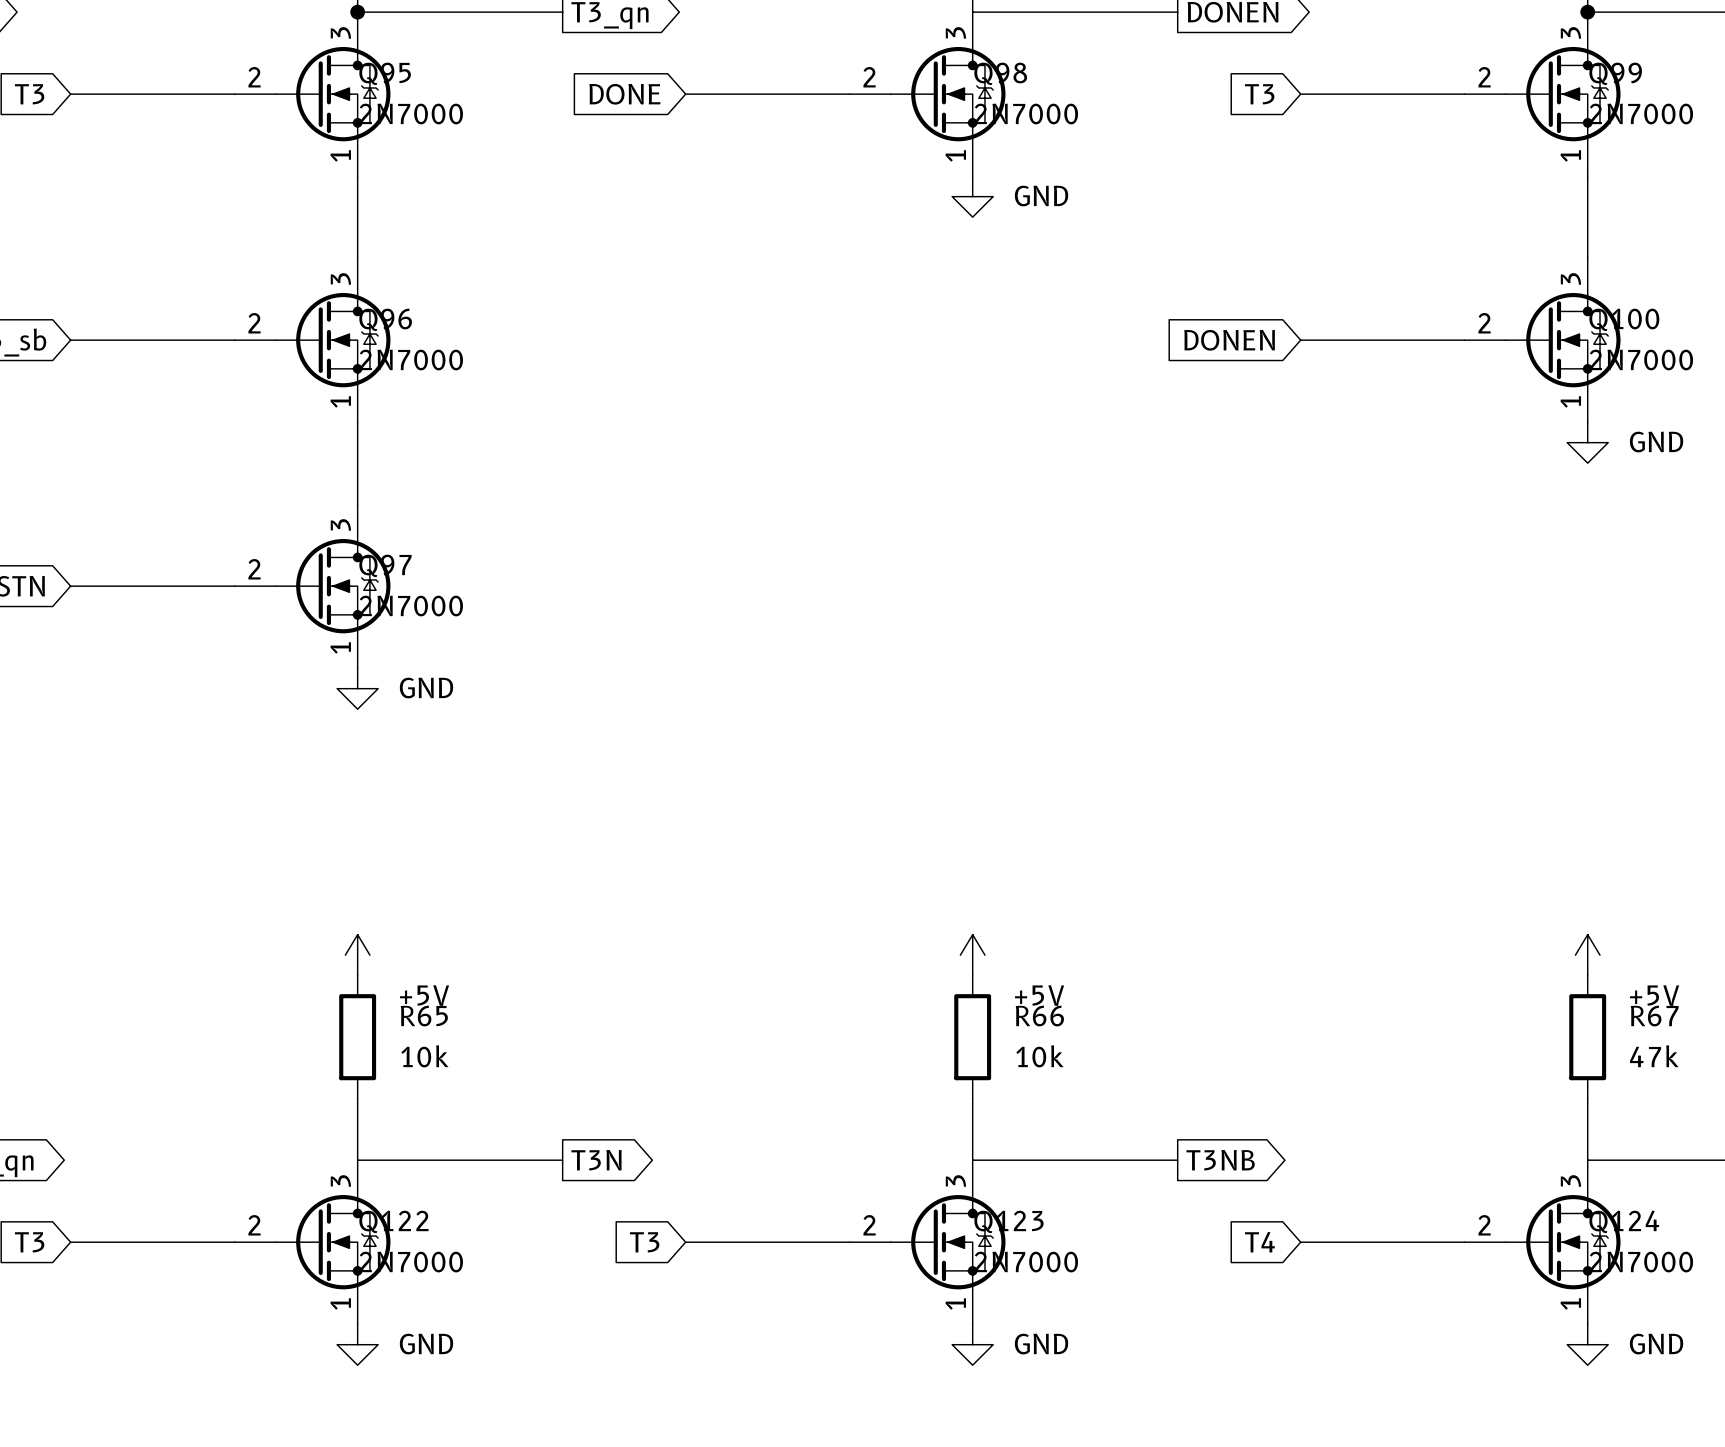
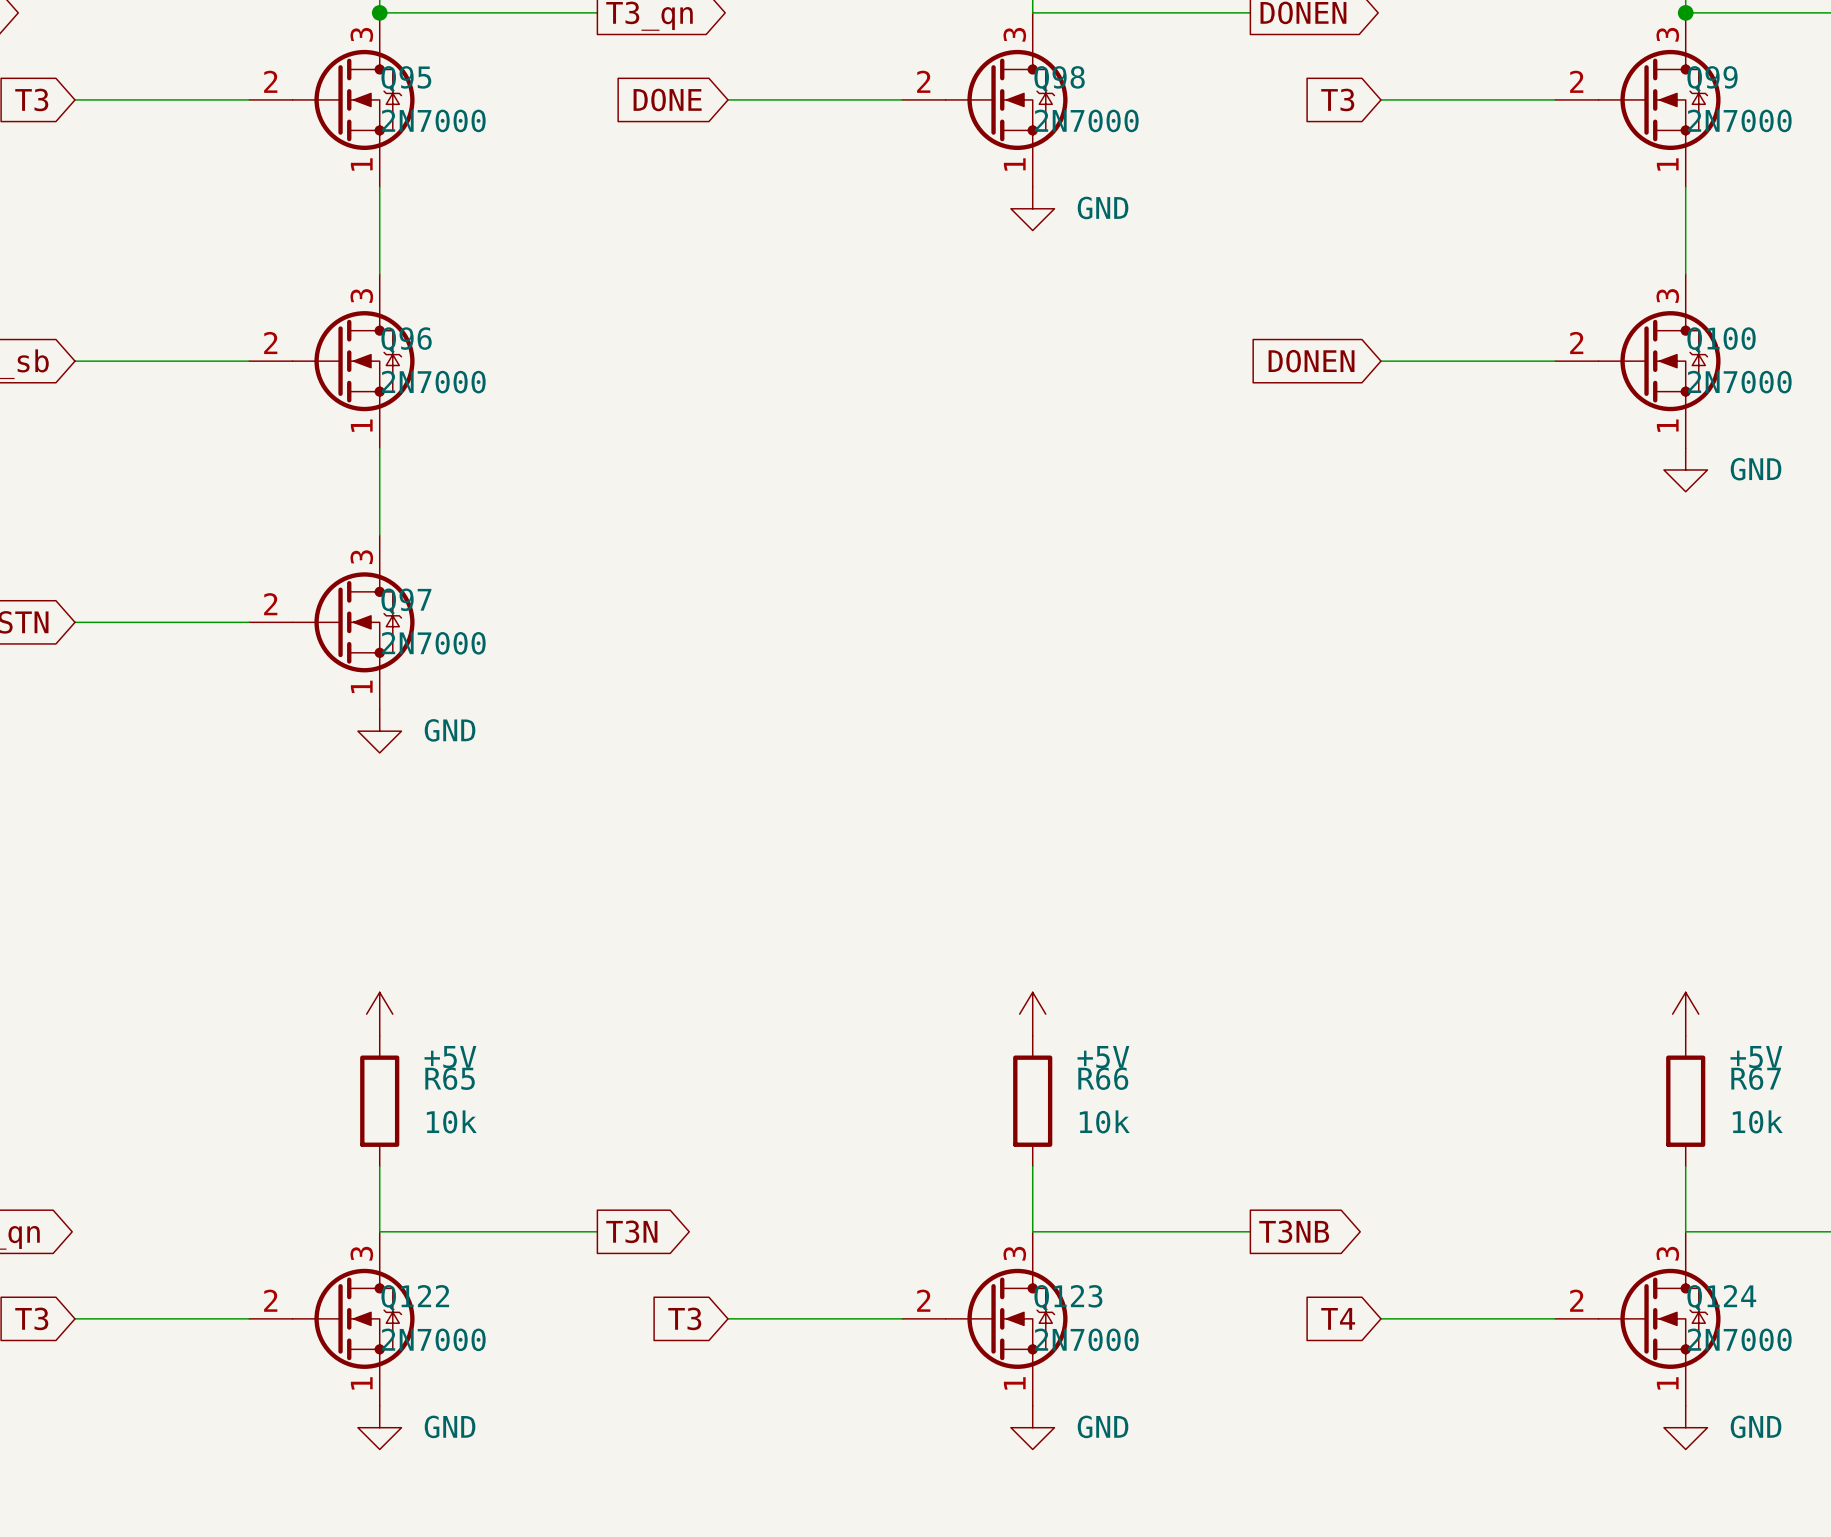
R67 value: 47k (1654, 1056) -> 10k (1757, 1121)

